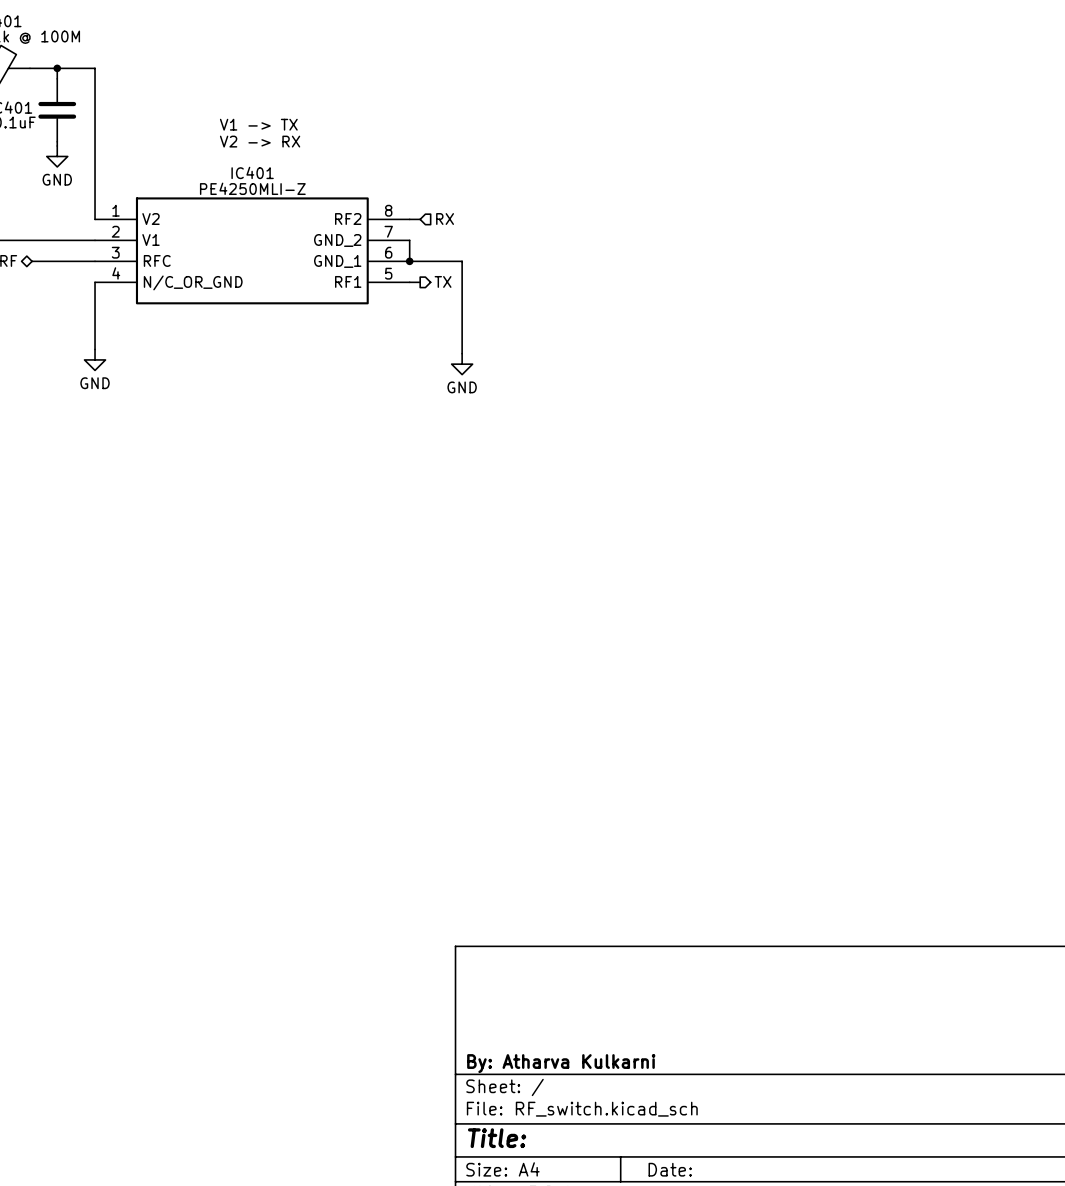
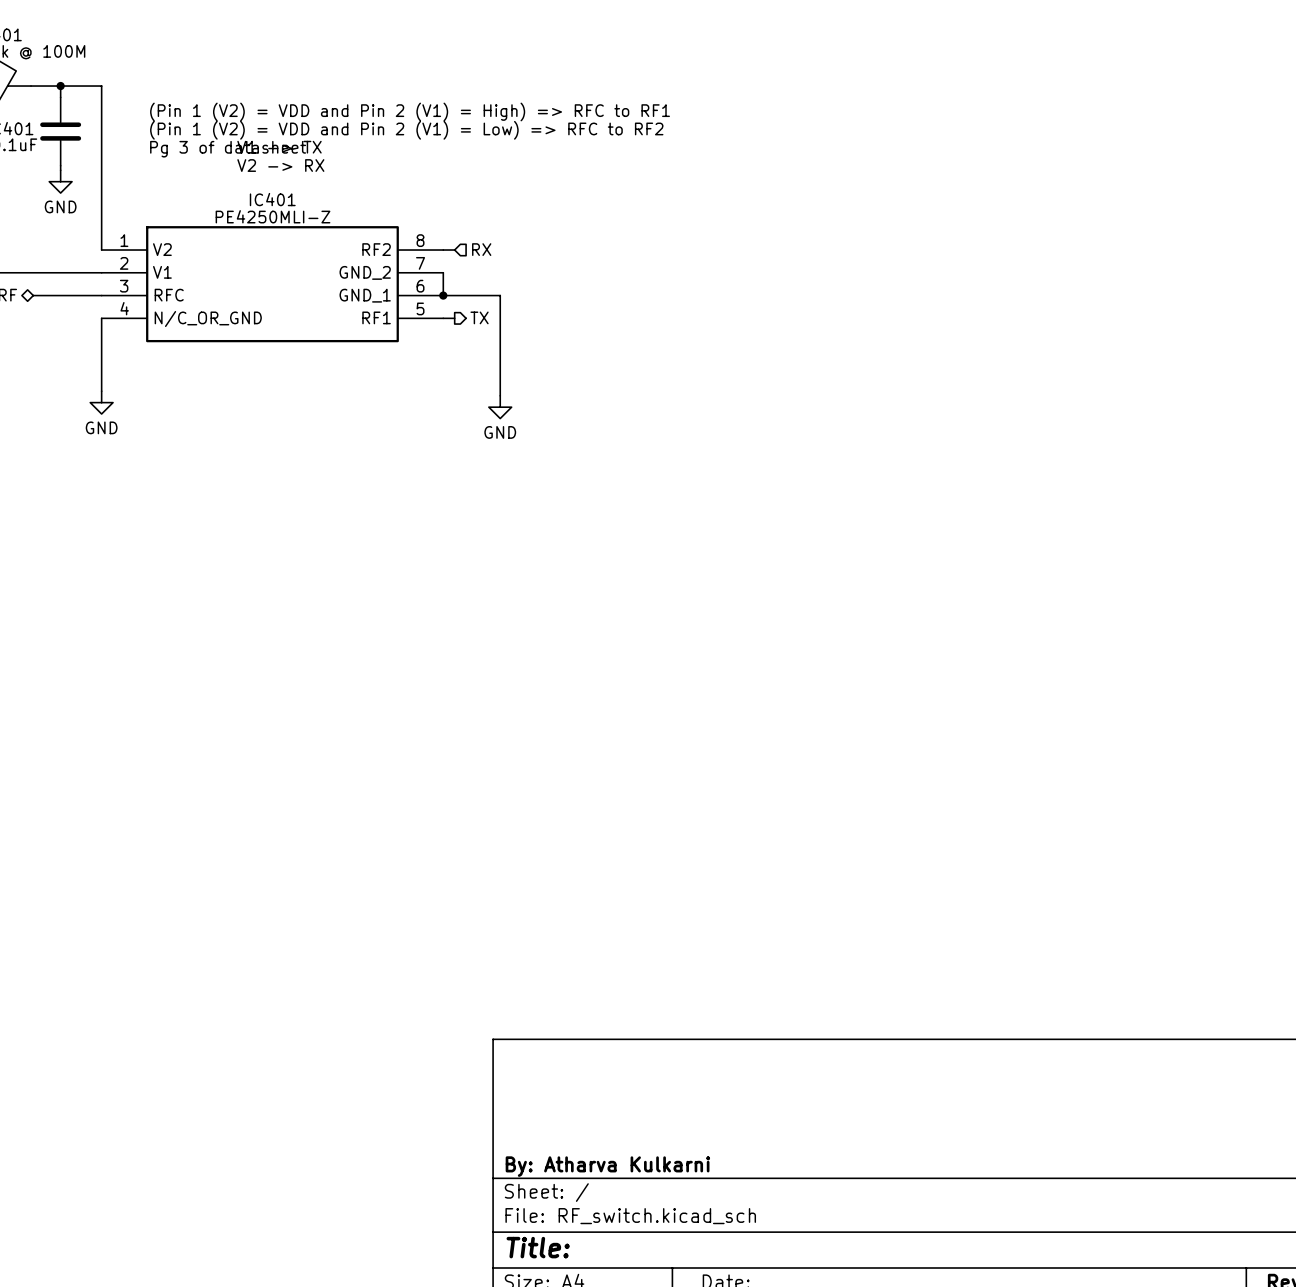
text: none -> (Pin 1 (V2) = VDD and Pin 2 (V1) = High) => RFC to RF1 (410, 111)
text: none -> (Pin 1 (V2) = VDD and Pin 2 (V1) = Low) => RFC to RF2 (406, 130)
text: none -> Pg 3 of datasheet (228, 149)

